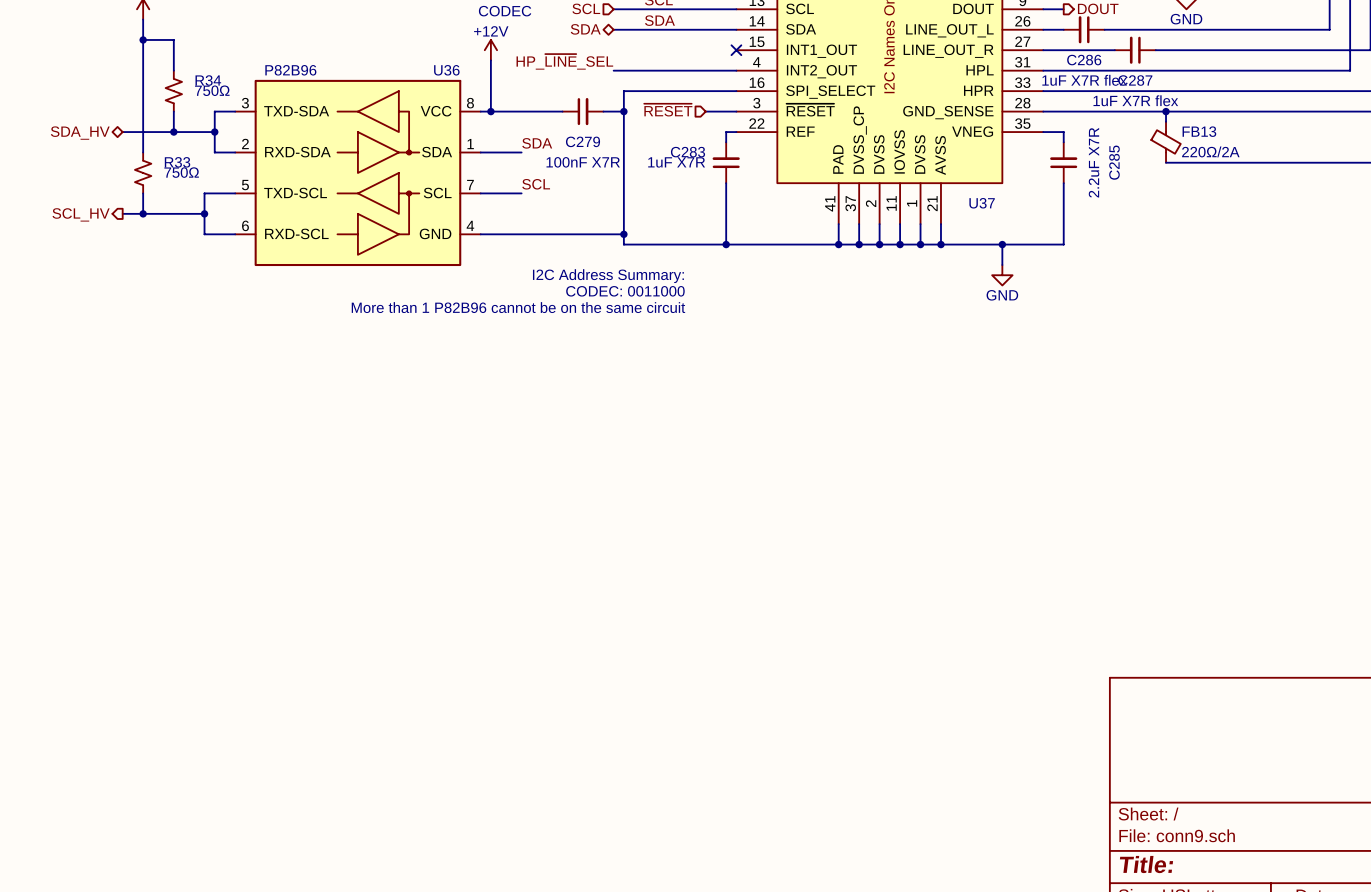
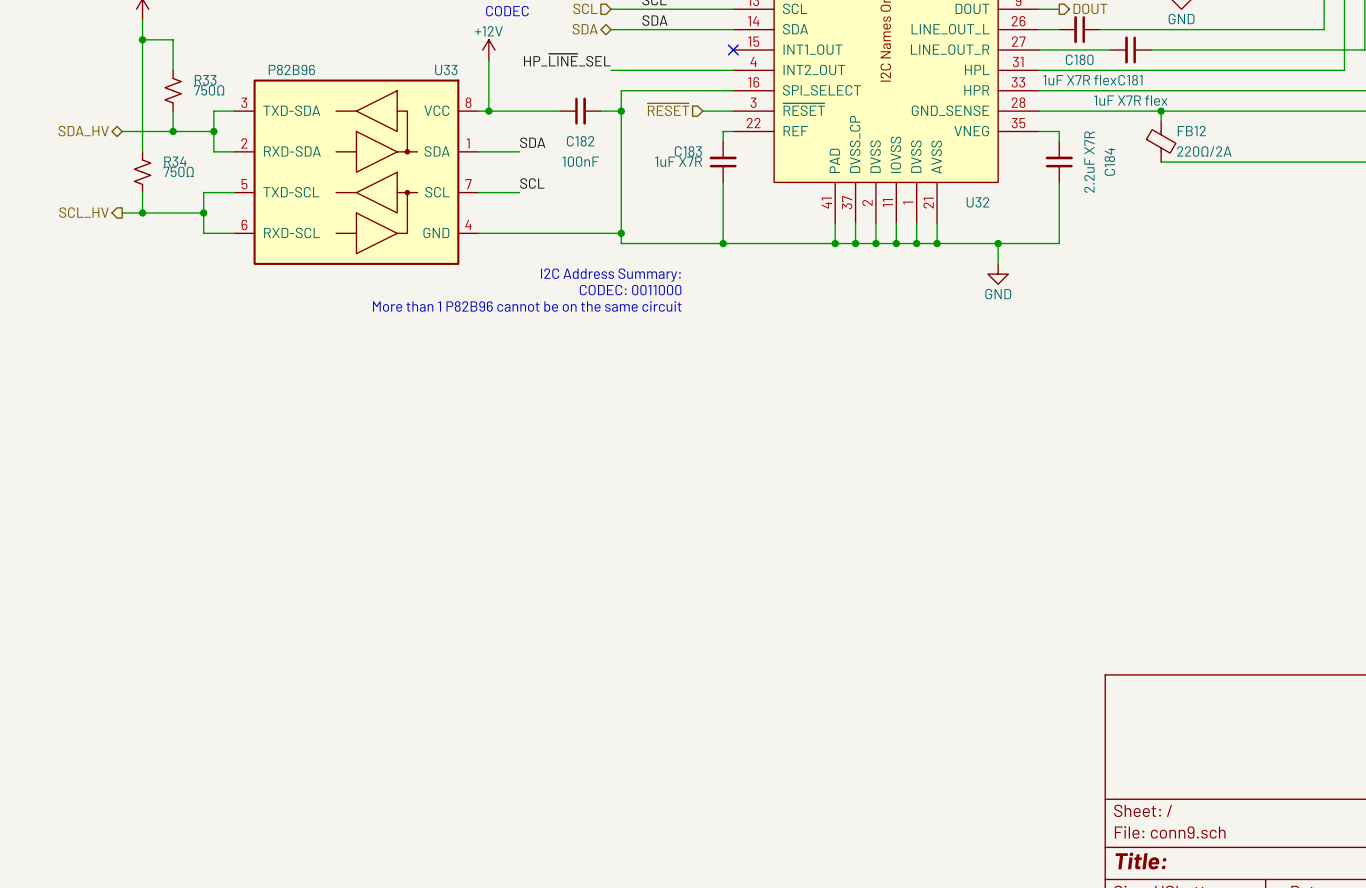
C286 name: C286 (1084, 60) -> C180 (1079, 59)
U36 name: U36 (446, 70) -> U33 (446, 70)
R34 name: R34 (208, 80) -> R33 (205, 80)
C287 name: C287 (1135, 80) -> C181 (1130, 80)
FB13 name: FB13 (1199, 131) -> FB12 (1191, 131)
C279 name: C279 (583, 141) -> C182 (580, 141)
C283 name: C283 (688, 152) -> C183 (688, 151)
R33 name: R33 (177, 162) -> R34 (175, 161)
C279 value: 100nF X7R (583, 162) -> 100nF (580, 161)
C285 name: C285 (1114, 162) -> C184 (1109, 161)
U37 name: U37 (982, 203) -> U32 (978, 202)

